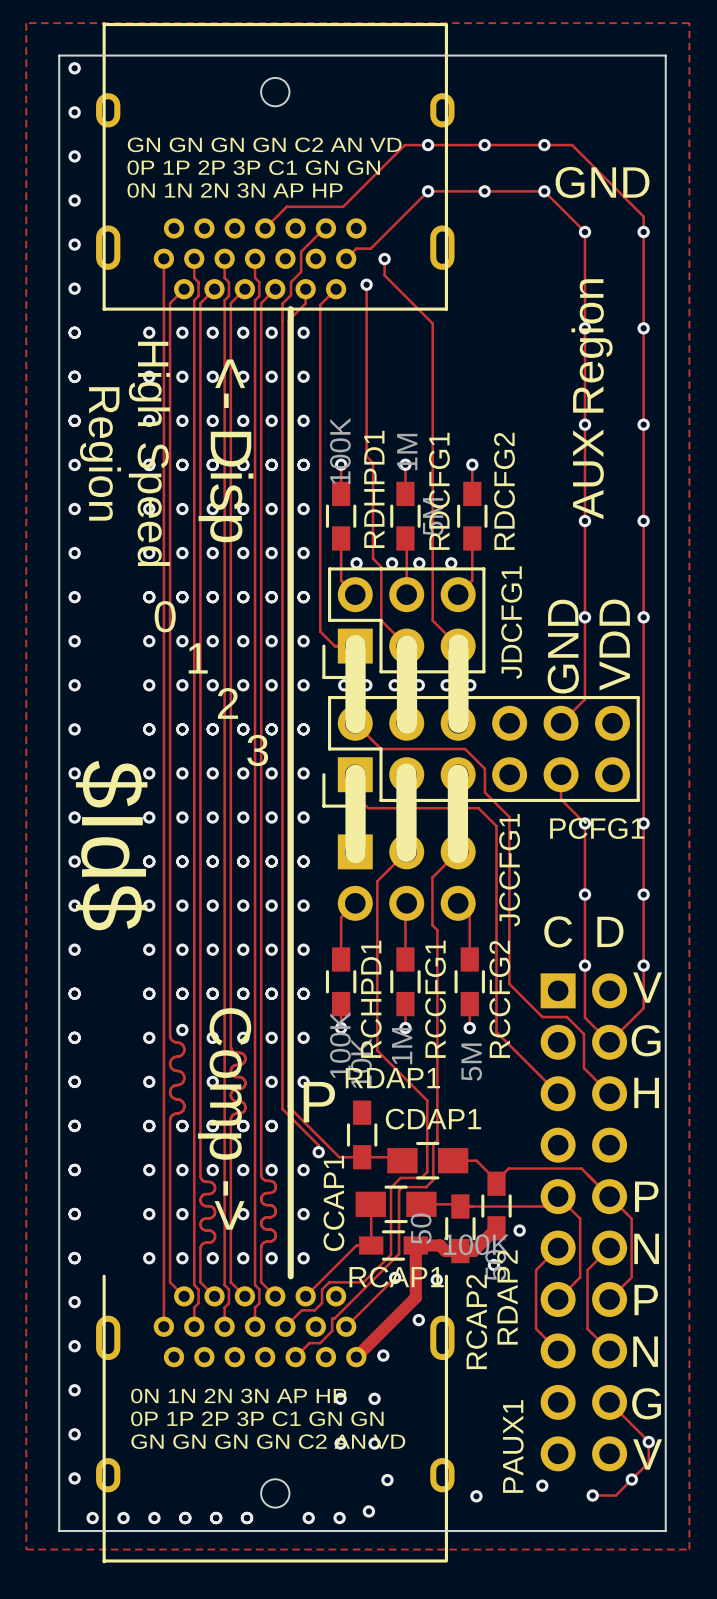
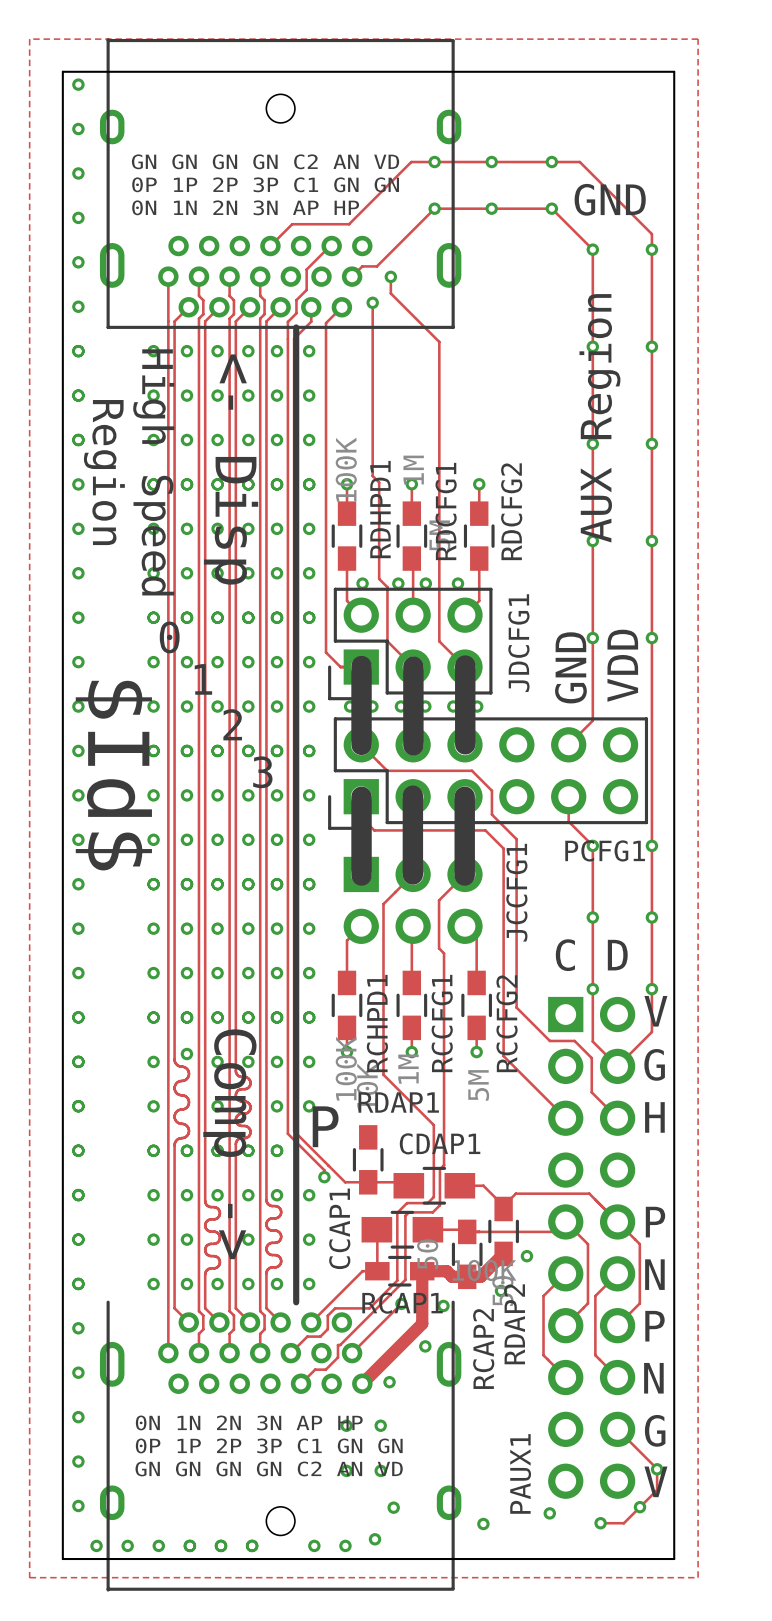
text position: $Id$ (111, 845) -> $Id$ (113, 775)

